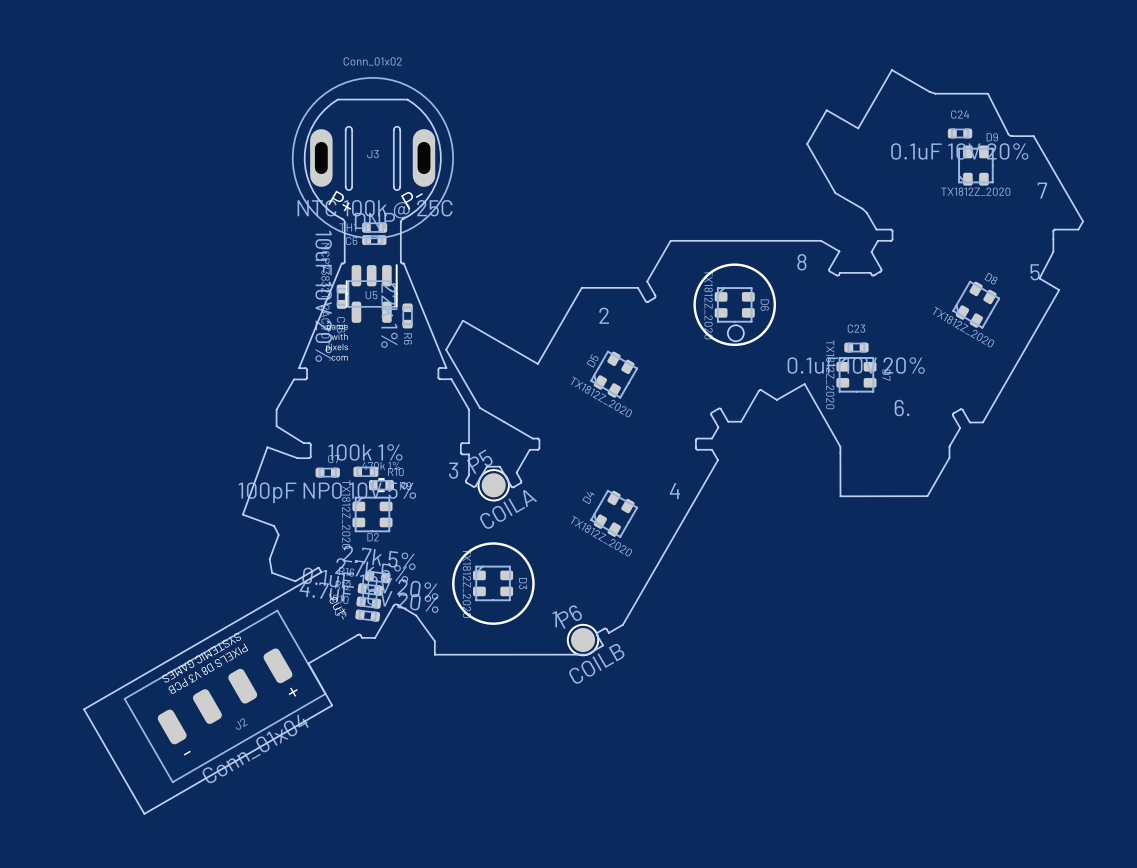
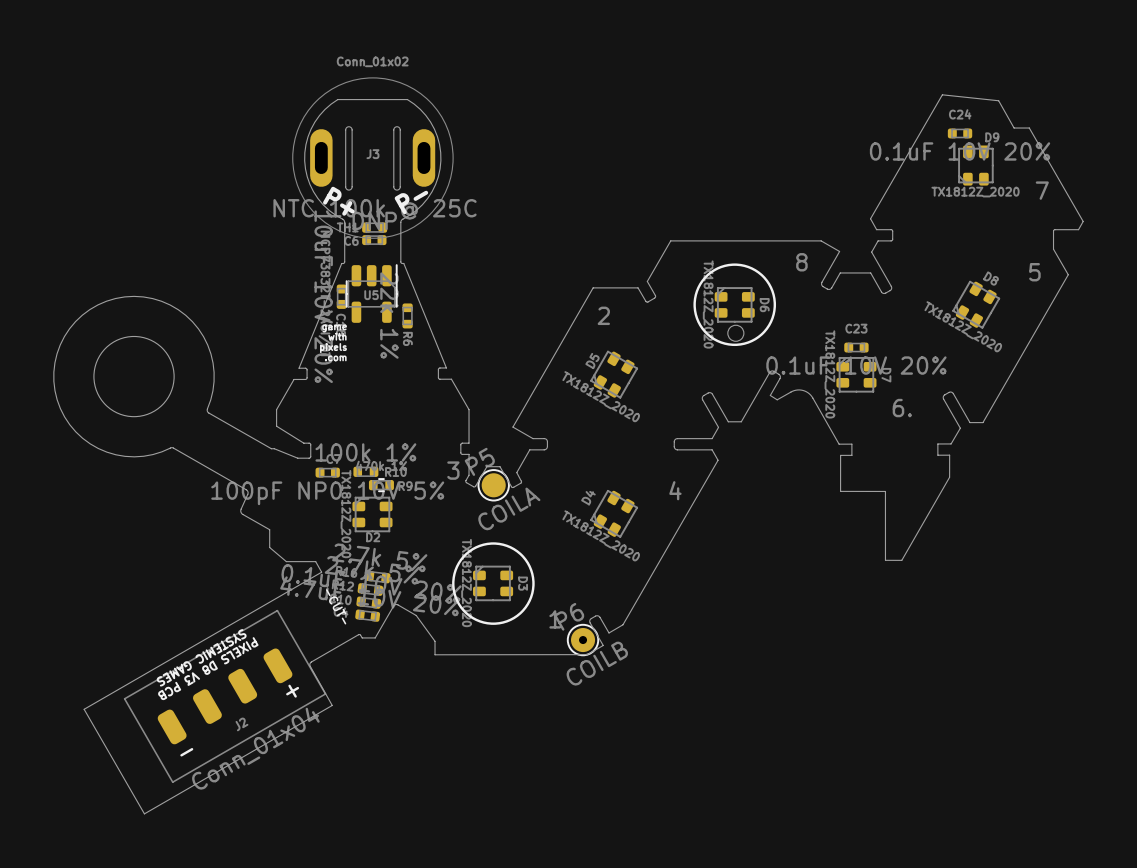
board edge: (593, 287) (581, 287) (537, 363) (462, 320) (446, 349) (479, 407) (532, 438) (539, 439) (539, 449) (529, 449) (516, 472) (520, 483) (511, 487) (499, 466) -> (593, 287) (512, 427) (532, 438) (545, 439) (546, 448) (529, 449) (516, 472) (521, 482) (513, 487) (499, 466)
board edge: (637, 287) (646, 301) (655, 297) (647, 281) (670, 240) (821, 240) (839, 251) (829, 269) (836, 275) (840, 272) (870, 272) (873, 275) (881, 271) (871, 252) (877, 240) (892, 240) (892, 230) (876, 229) (862, 208) (835, 193) (807, 144) (826, 110) (858, 128) (891, 70) (935, 93) (987, 93) (1009, 135) (1033, 136) (1083, 221) (1078, 229) (1053, 230) (1053, 251) (1039, 278) (1059, 290) (982, 422) (969, 422) (961, 409) (952, 413) (960, 428) (949, 446) (949, 457) (927, 496) (840, 496) (840, 446) (804, 384) (776, 399) (760, 390) (741, 421) (728, 421) (719, 408) (711, 413) (718, 427) (711, 438) (696, 439) (695, 448) (711, 449) (717, 460) (622, 624) (608, 632) (605, 628) (597, 633) (603, 645) (587, 654) (434, 654) (434, 641) (416, 615) (397, 604) -> (638, 287) (646, 301) (655, 297) (647, 281) (670, 240) (821, 240) (839, 251) (821, 282) (823, 286) (830, 288) (840, 272) (870, 272) (882, 292) (890, 290) (891, 286) (871, 252) (878, 240) (892, 240) (892, 230) (876, 229) (870, 218) (942, 94) (998, 100) (1014, 128) (1029, 128) (1083, 221) (1078, 229) (1053, 230) (1053, 249) (1068, 274) (982, 422) (969, 422) (952, 392) (949, 392) (943, 396) (960, 428) (951, 443) (937, 443) (937, 455) (949, 455) (949, 477) (901, 560) (885, 560) (885, 491) (840, 491) (840, 455) (851, 455) (851, 444) (839, 444) (812, 398) (806, 391) (794, 390) (777, 399) (770, 395) (780, 377) (779, 374) (771, 371) (741, 421) (728, 421) (712, 393) (708, 392) (703, 395) (702, 399) (718, 427) (712, 438) (674, 440) (674, 447) (676, 449) (712, 449) (718, 460) (622, 624) (609, 632) (599, 616) (595, 615) (590, 619) (590, 622) (603, 645) (587, 654) (435, 654) (435, 641) (416, 615) (395, 604) (375, 637) (362, 637) (358, 634) (310, 663) (332, 705) (144, 813) (84, 709) (321, 572) (315, 561) (286, 561) (269, 547) (269, 529) (241, 512) (247, 493) (246, 490) (173, 448) (143, 456) (125, 456) (98, 448) (82, 438) (64, 416) (57, 399) (53, 372) (60, 344) (69, 328) (82, 315) (106, 301) (124, 296) (143, 296) (170, 305) (185, 315) (198, 328) (210, 353) (214, 381) (207, 412) (271, 448) (297, 458)
round board edge: none -> [93, 336, 175, 418]
board edge: (297, 458) (267, 447) (242, 514) (274, 526) (278, 534) (269, 559) (272, 572) (295, 581) (318, 567) (321, 572) (84, 709) (144, 813) (332, 705) (308, 663) (358, 634) (362, 637) (375, 637) (393, 605) (397, 604) -> none
P6 footprint: [566, 623, 600, 657] -> [566, 623, 600, 657]

